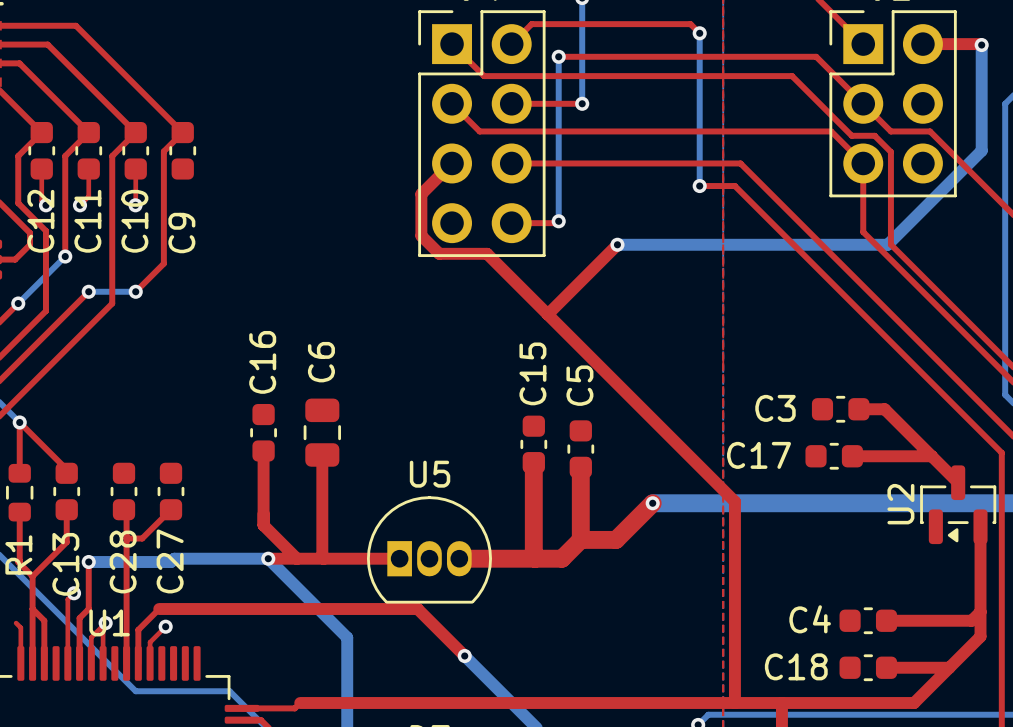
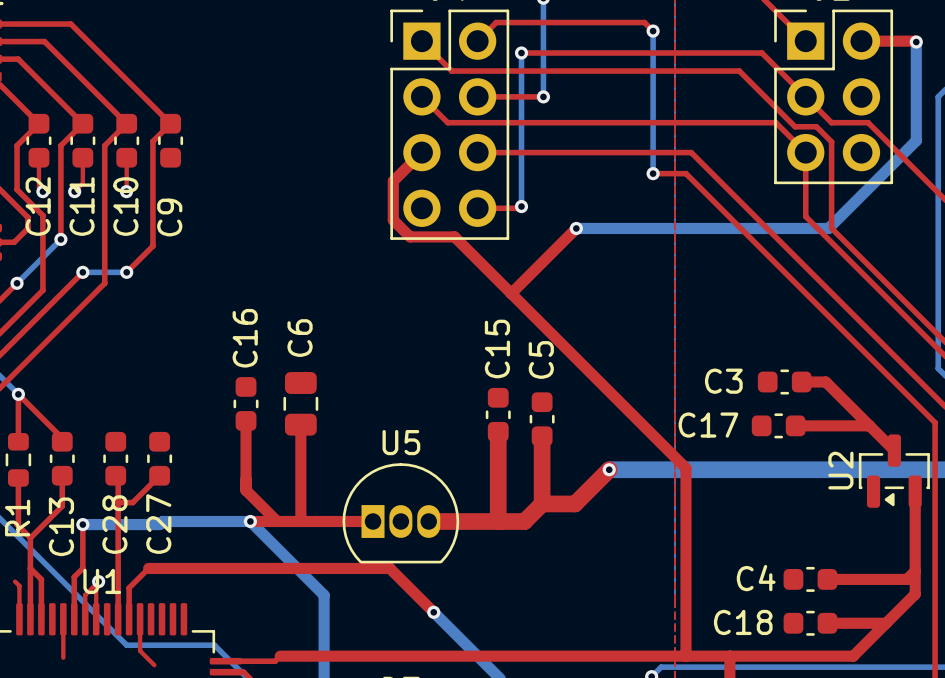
top track: (74, 593) (67, 599) (67, 663) -> (63, 657) (63, 619)
via: (74, 593) -> none
top track: (165, 626) (150, 642) (150, 663) -> (154, 665) (140, 650) (140, 619)
via: (165, 626) -> none

